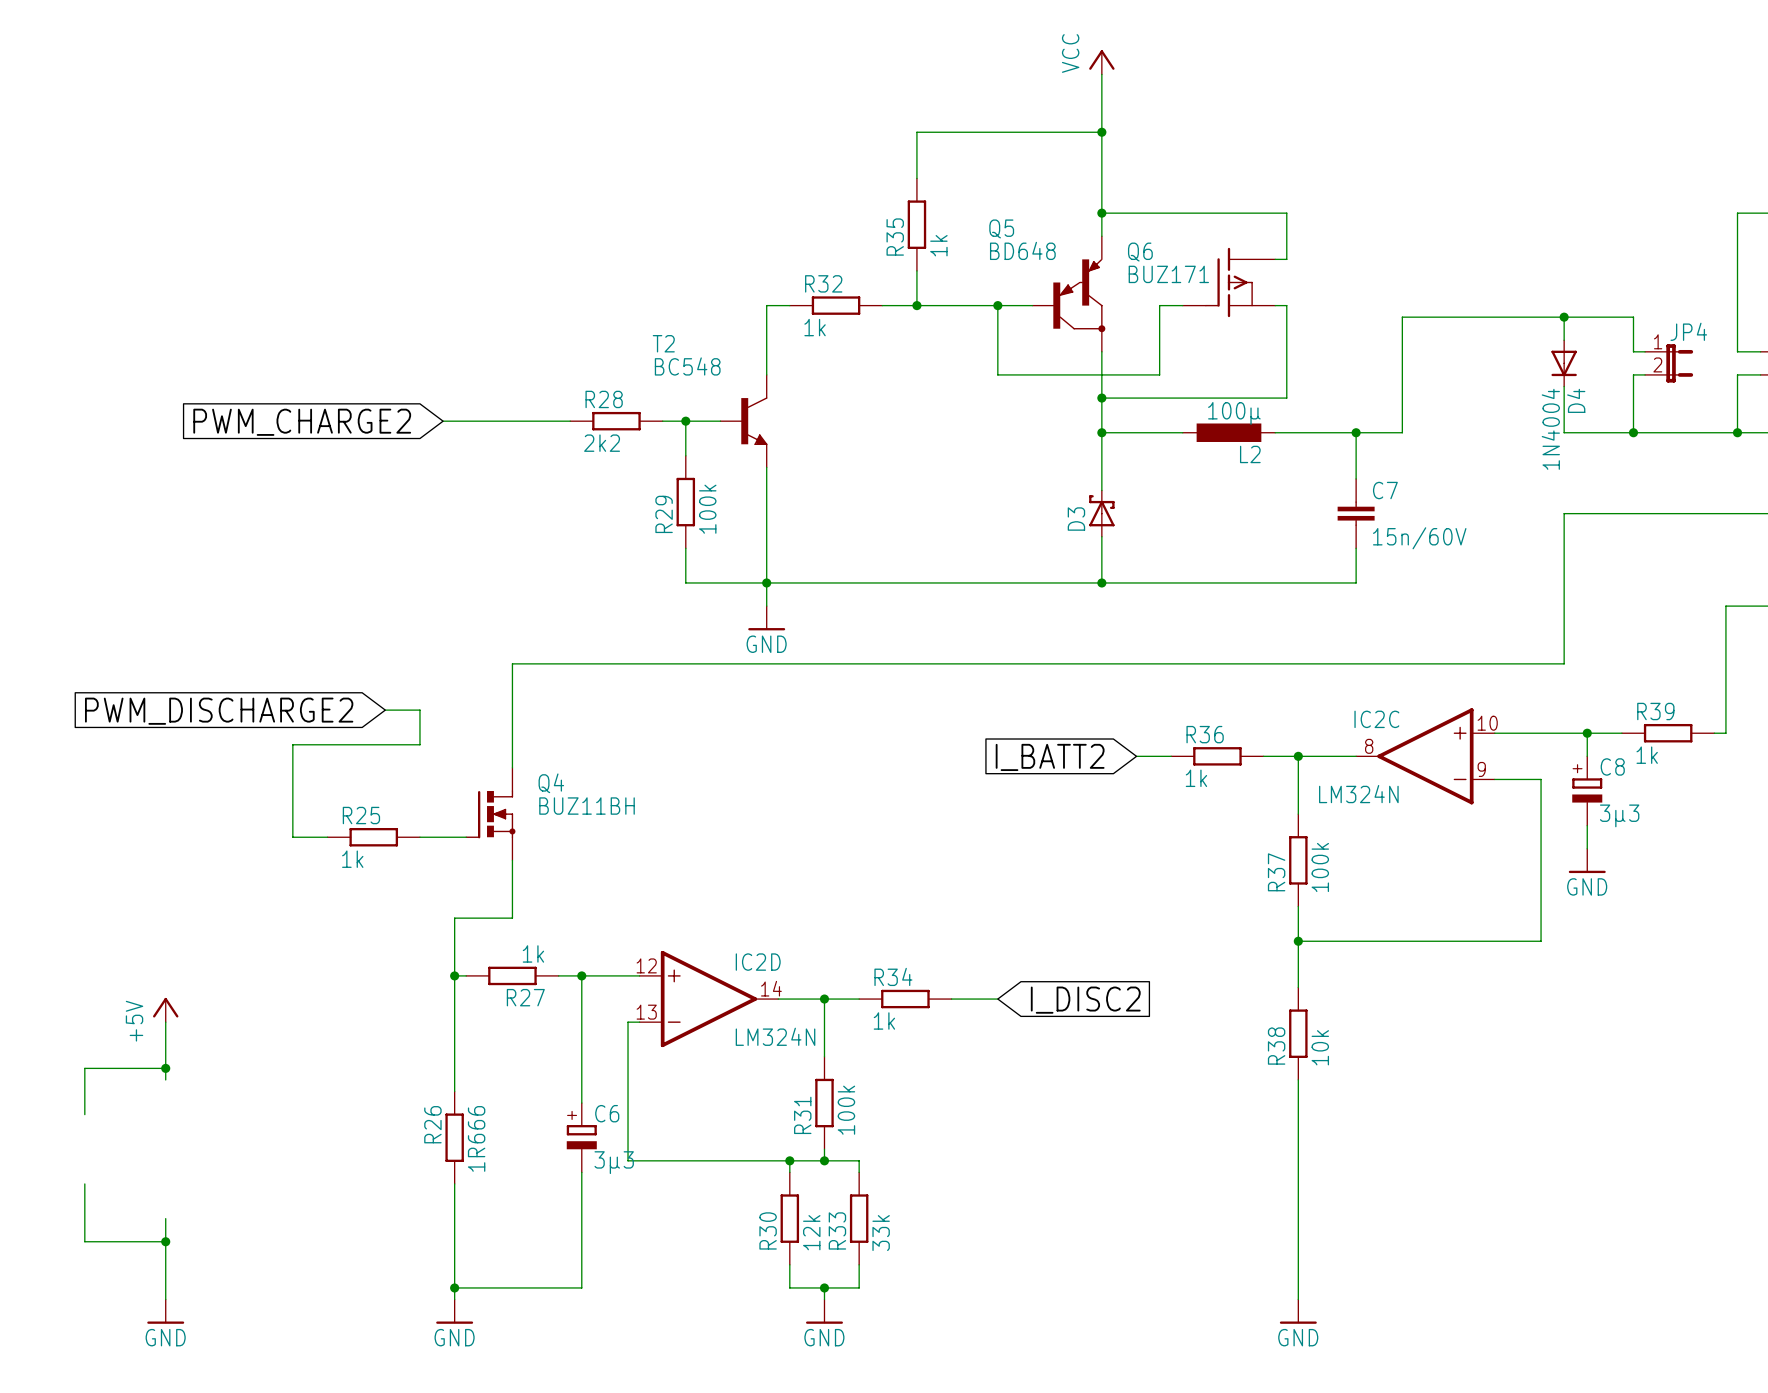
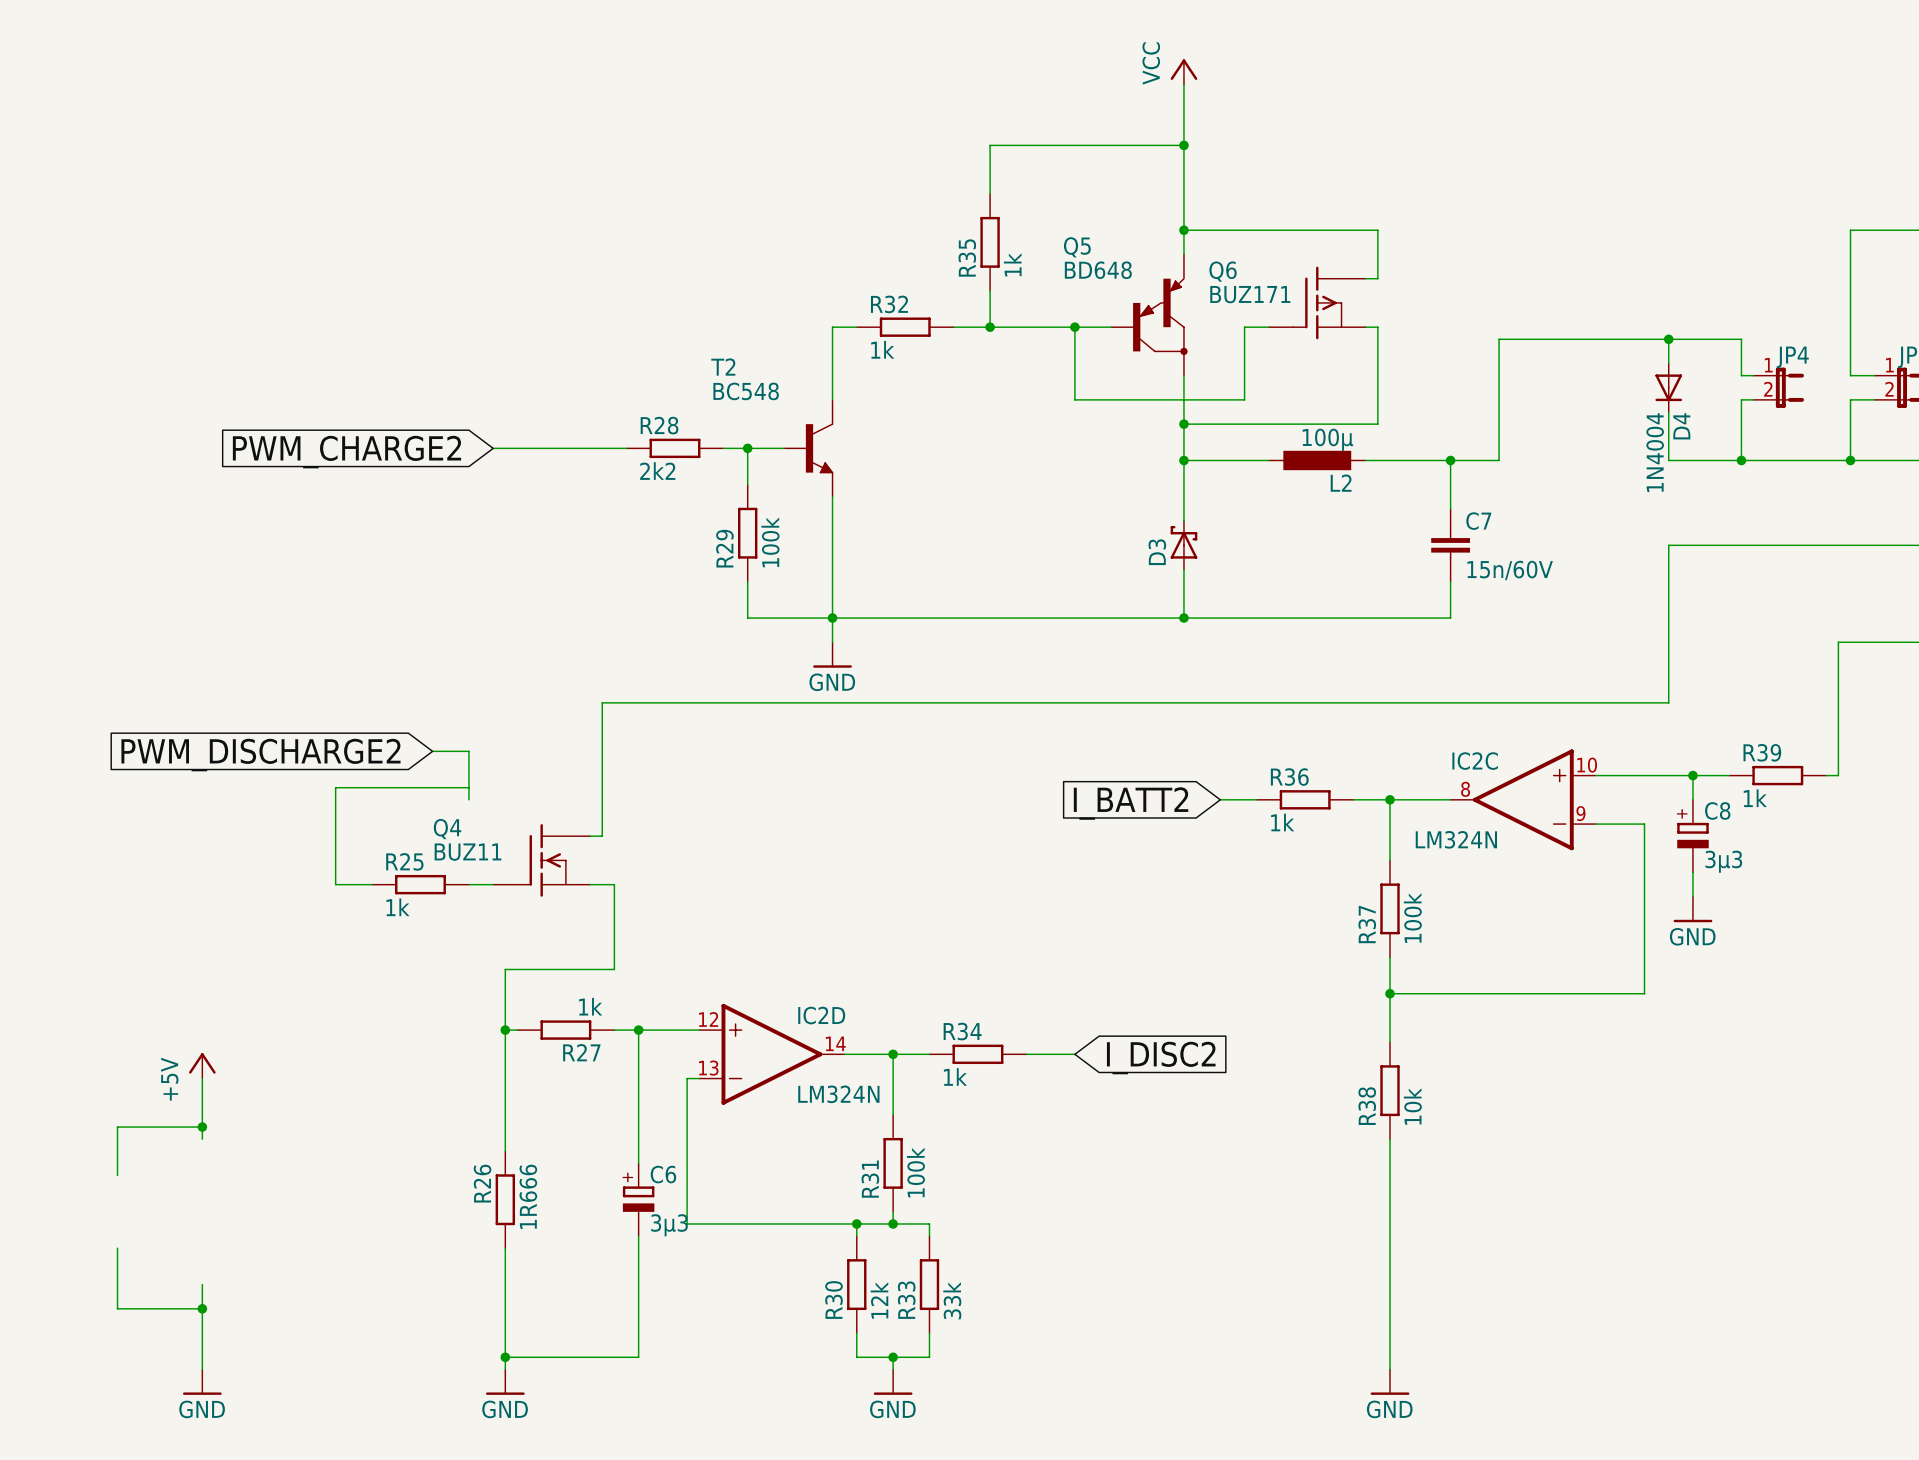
wire: (547, 663) (512, 663) (512, 767) -> (602, 702) (602, 836) (590, 836)
wire: none -> (468, 787) (468, 799)
Q4 symbol: [465, 767, 516, 861] -> [493, 824, 591, 897]
Q4 name position: Q4 (551, 783) -> Q4 (447, 829)
Q4 value: BUZ11BH (587, 806) -> BUZ11 (468, 852)
wire: (512, 860) (512, 918) -> (590, 884) (614, 884) (614, 969) (565, 969)

